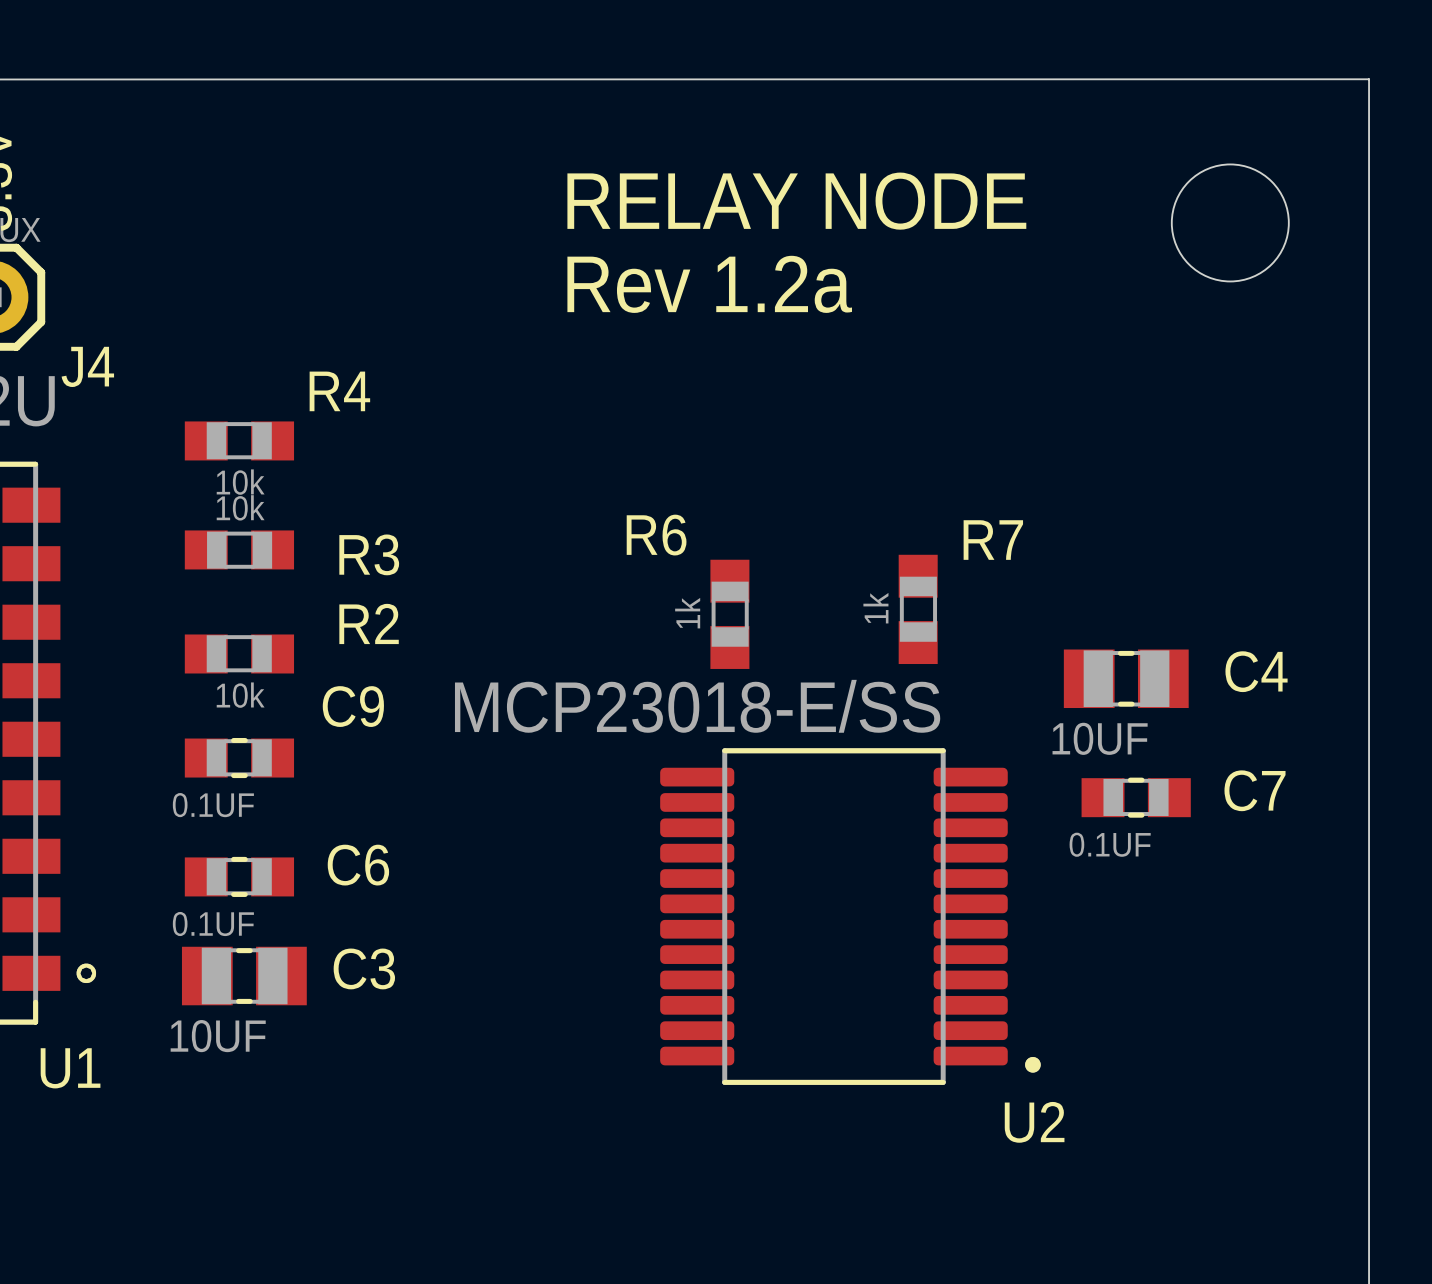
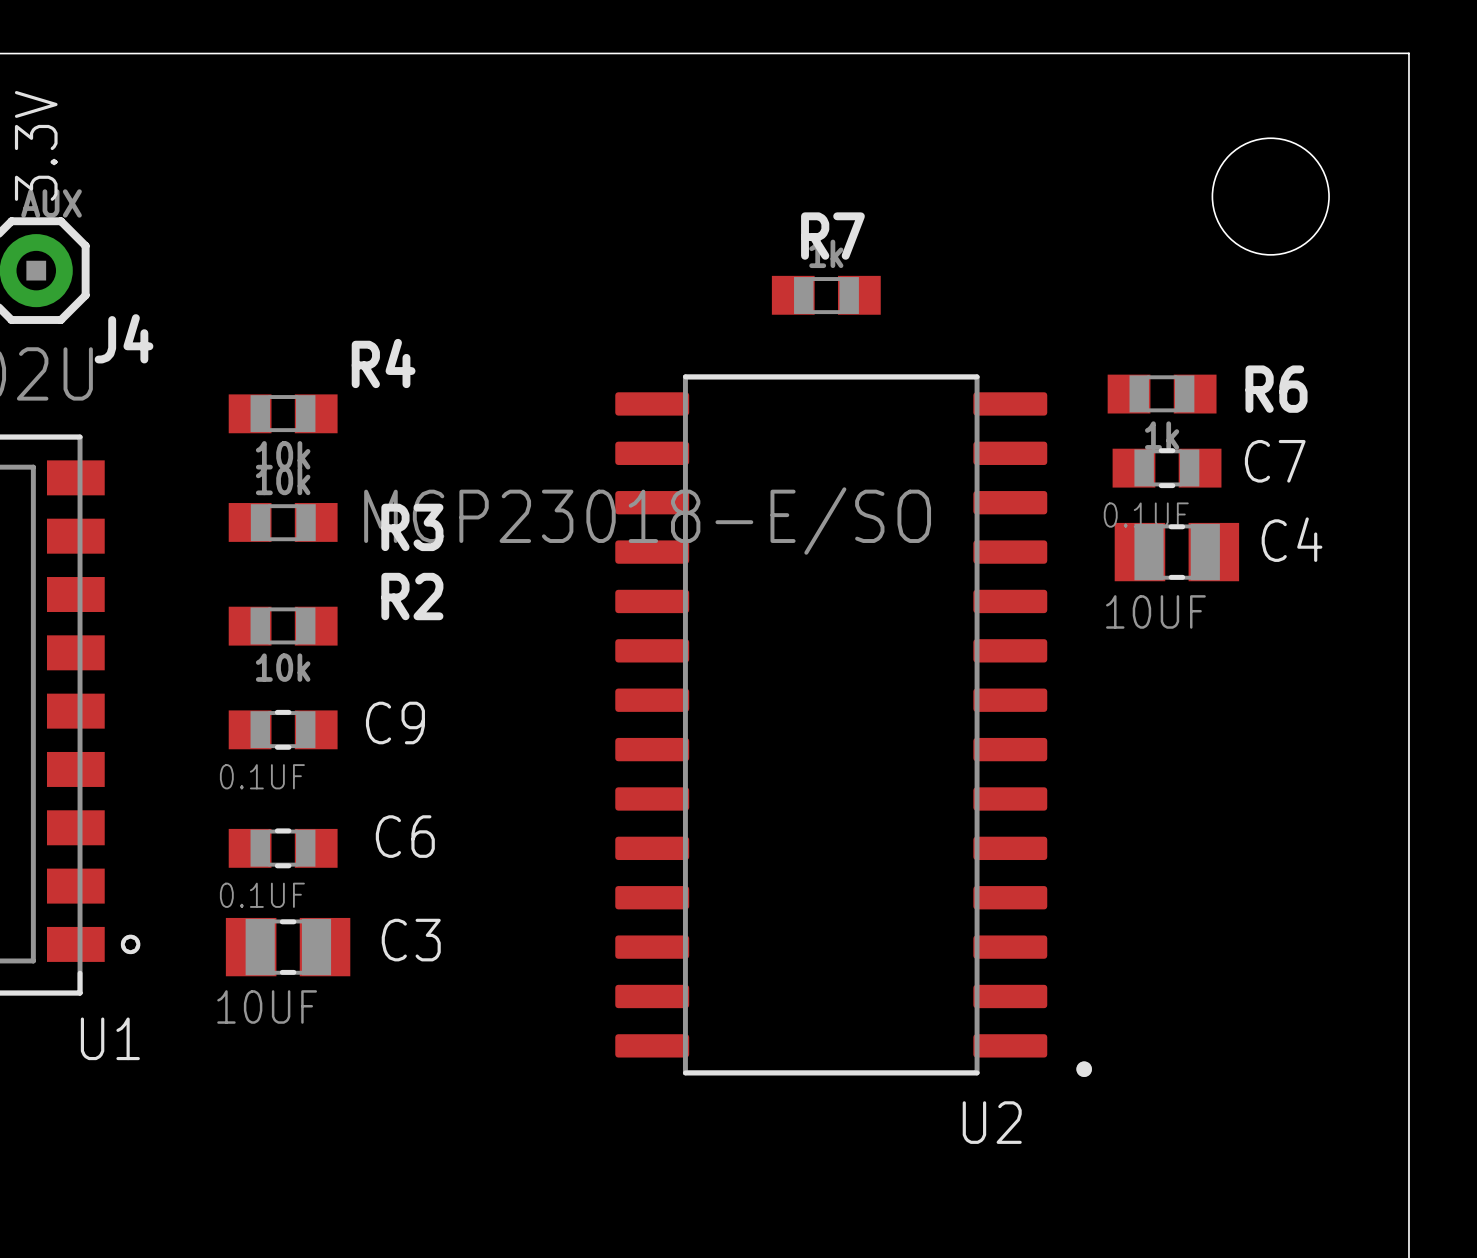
text: RELAY NODE (796, 201) -> none
text: Rev 1.2a (709, 284) -> none
R6 name position: R6 (656, 535) -> R6 (1276, 389)
R7 rotation: 0° (918, 609) -> 90° clockwise (826, 295)
R7 position: (918, 609) -> (826, 295)
R6 rotation: 0° (729, 614) -> 90° clockwise (1162, 394)
R6 position: (729, 614) -> (1162, 394)
C4 name position: C4 (1256, 671) -> C4 (1292, 539)
C4 position: (1126, 678) -> (1176, 552)
C9 name position: C9 (353, 706) -> C9 (395, 722)
U2 value: MCP23018-E/SS (697, 706) -> MCP23018-E/SO (647, 521)
U2 footprint: [660, 748, 1041, 1085] -> [615, 374, 1092, 1077]
C7 name position: C7 (1255, 790) -> C7 (1275, 461)
C7 position: (1136, 797) -> (1167, 468)
U2 name position: U2 (1034, 1122) -> U2 (992, 1122)

